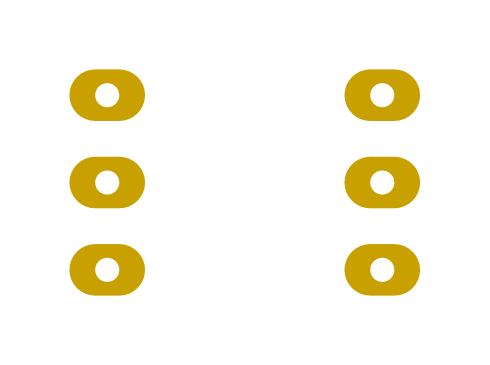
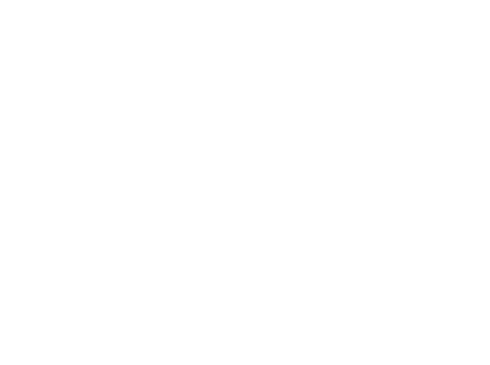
part: (107, 182) -> none
part: (382, 182) -> none

